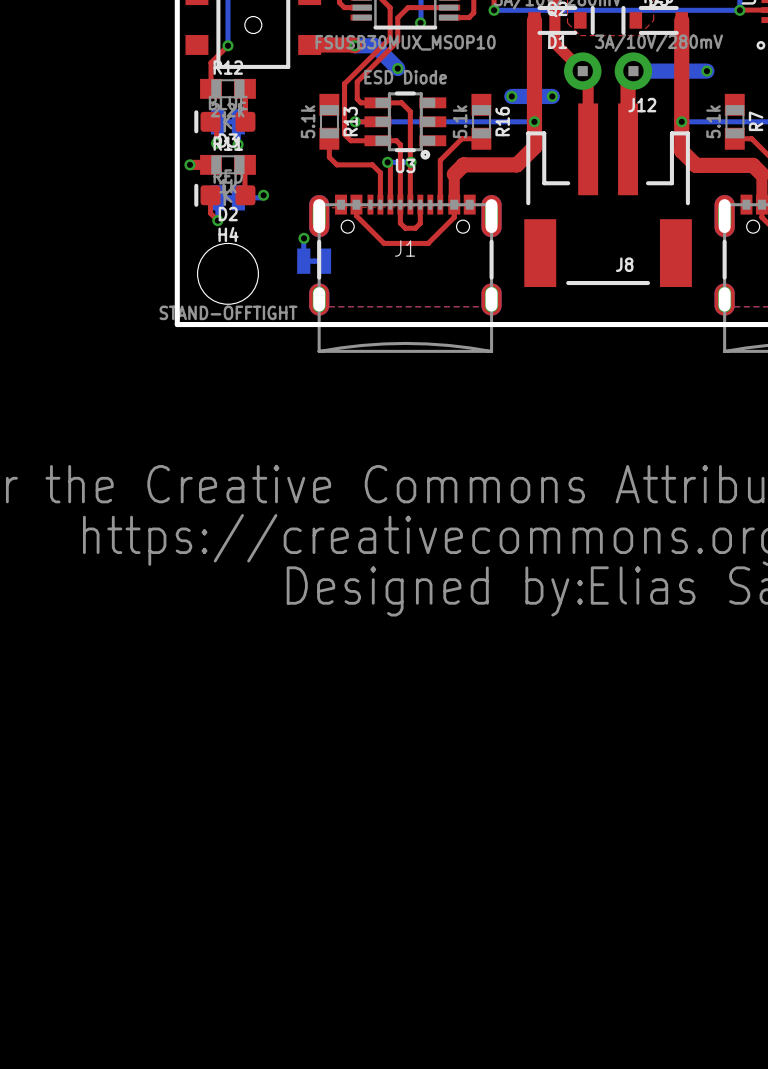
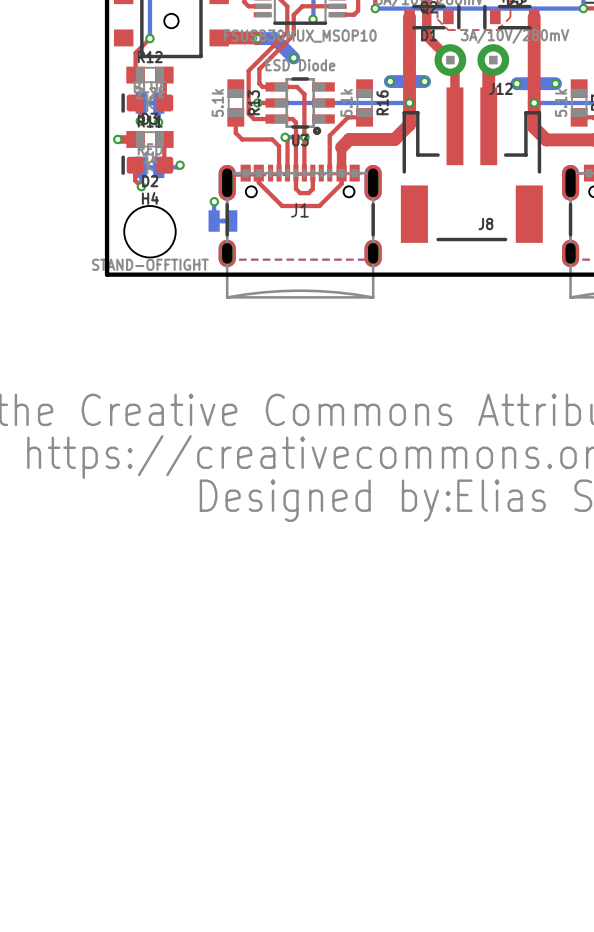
bottom track: (633, 71) (706, 71) -> none
via: (706, 71) -> none
bottom track: none -> (516, 83) (555, 83)
via: none -> (516, 83)
via: none -> (555, 83)

